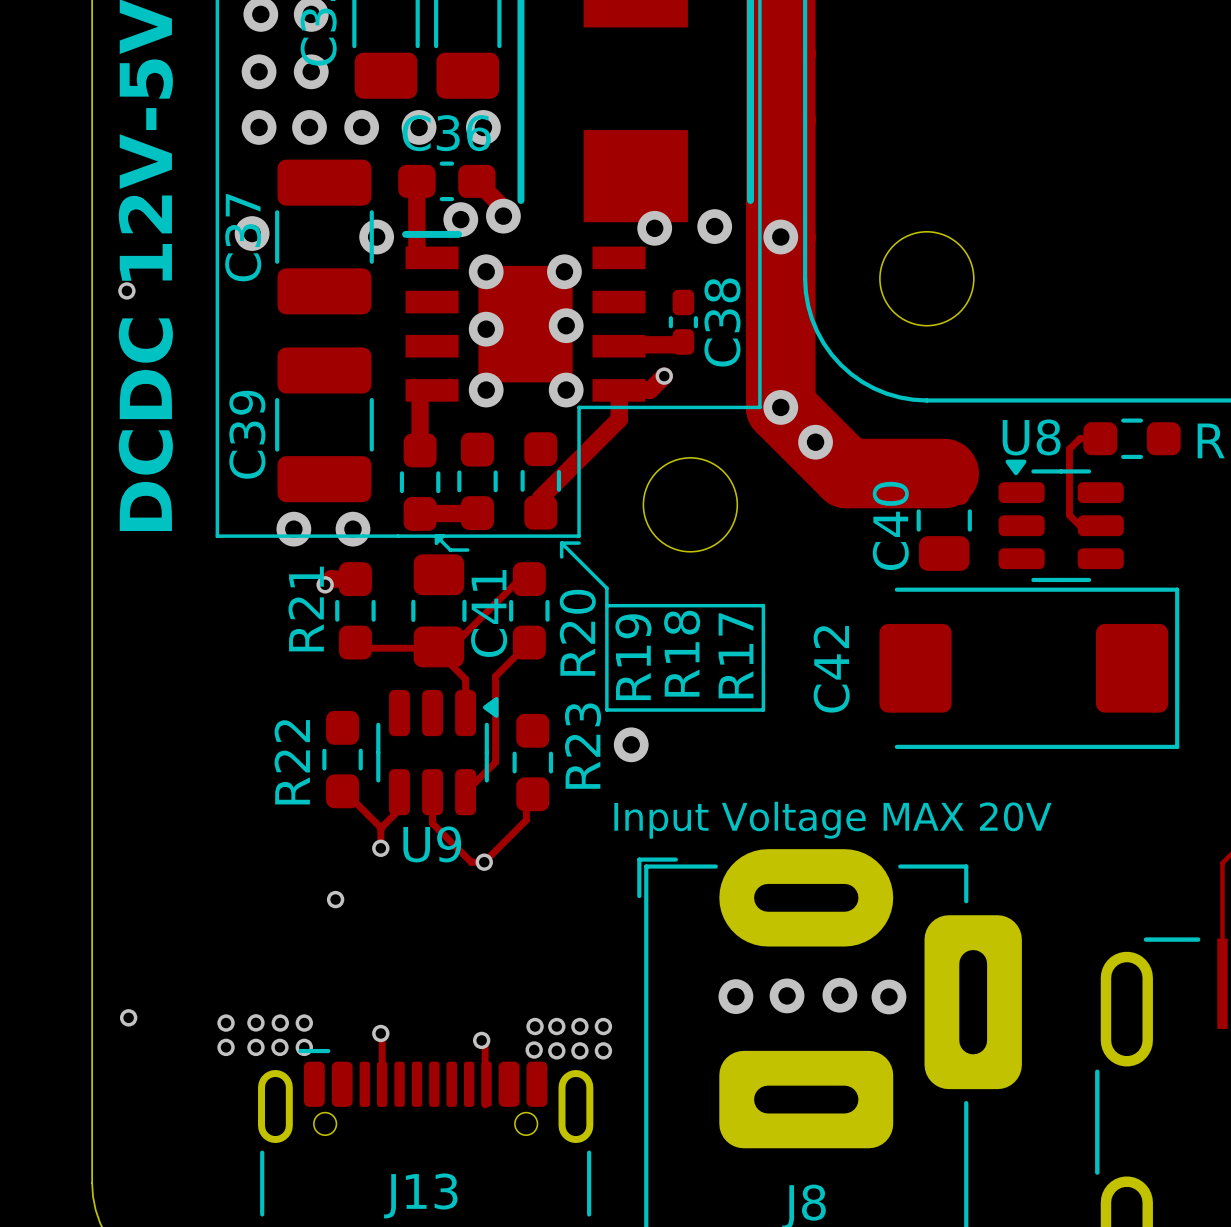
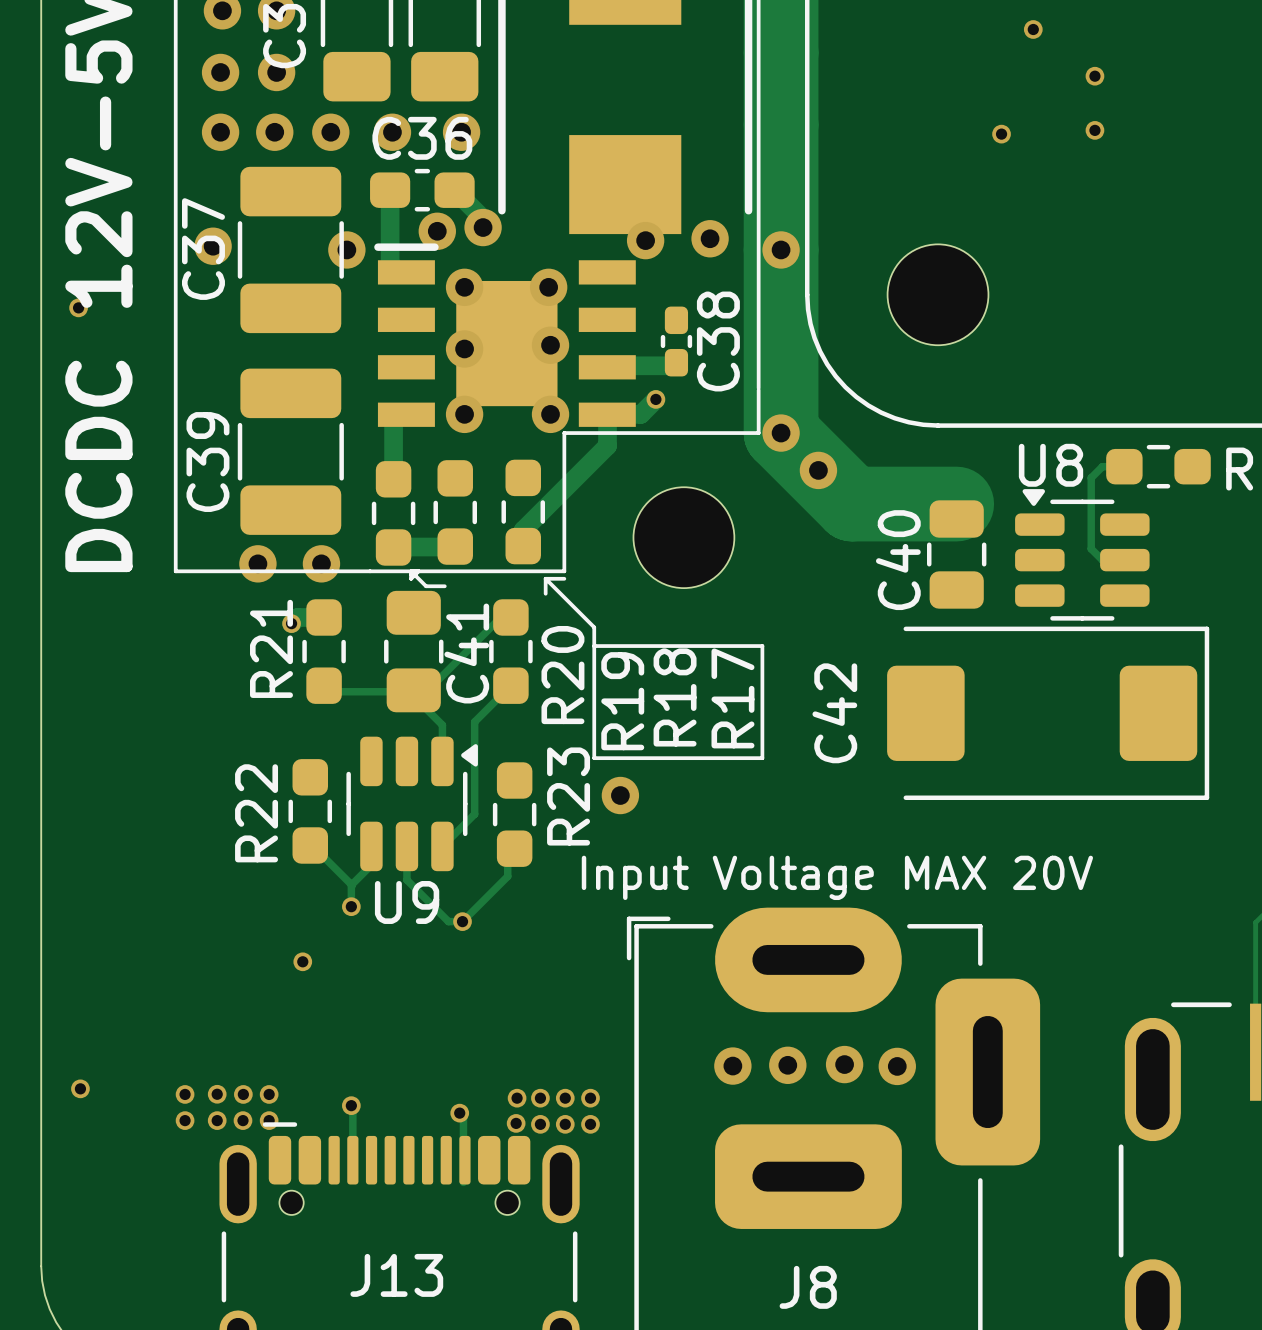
via: none -> (1033, 29)
via: none -> (1094, 76)
via: none -> (1094, 130)
via: none -> (1001, 134)

